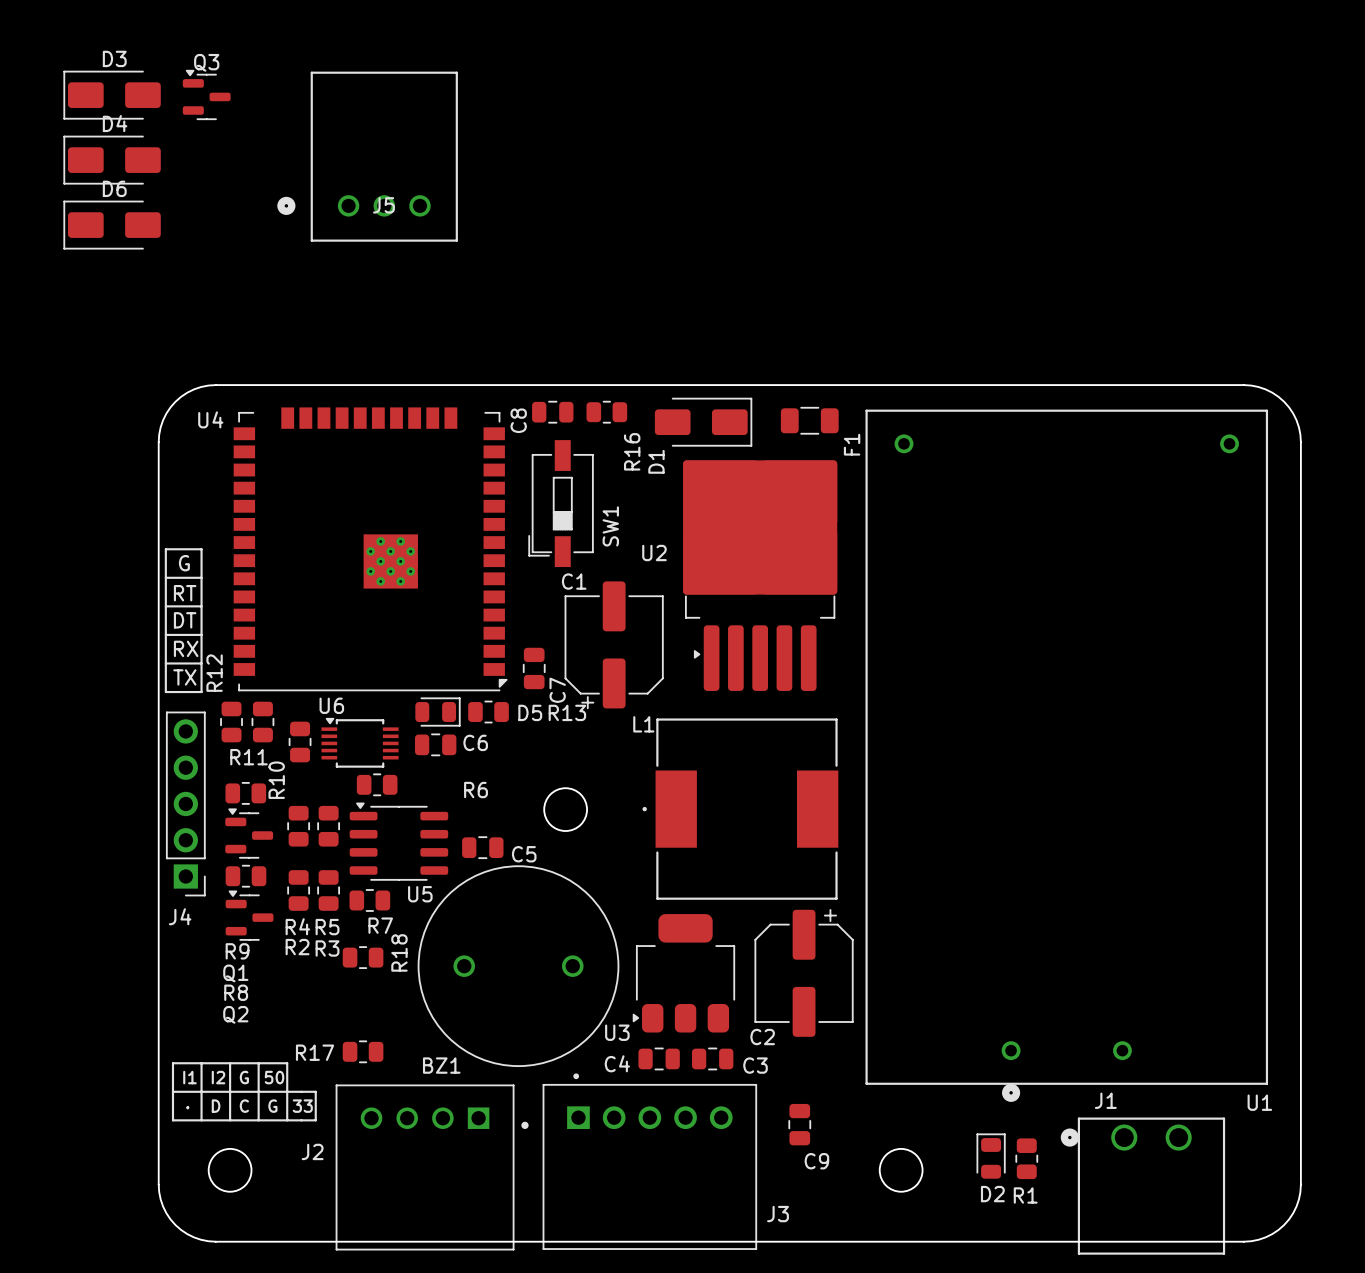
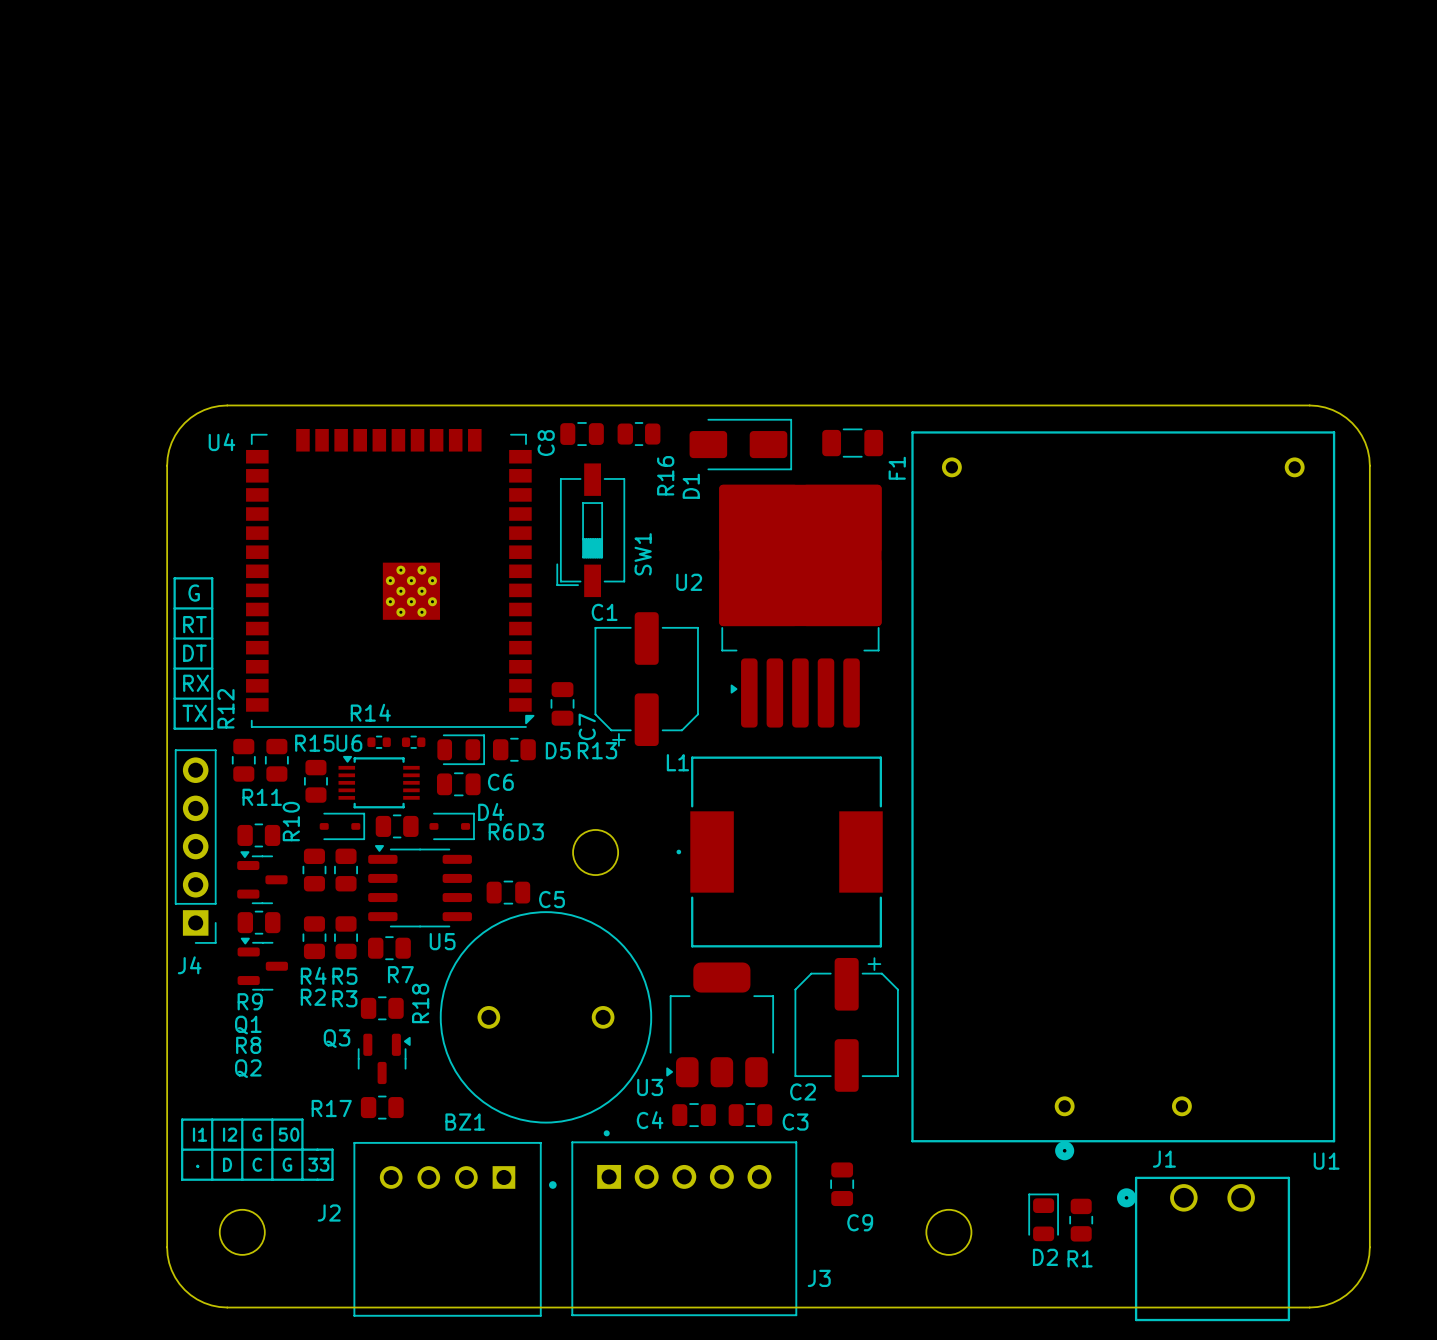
D3 name position: D3 (114, 58) -> D3 (531, 831)
Q3 name position: Q3 (206, 62) -> Q3 (337, 1038)
D3 footprint: [63, 70, 161, 120] -> [429, 812, 475, 841]
Q3 rotation: 0° (206, 94) -> 90° clockwise (384, 1058)
Q3 position: (206, 94) -> (384, 1058)
D4 name position: D4 (115, 123) -> D4 (491, 811)
D4 footprint: [63, 135, 161, 185] -> [319, 812, 366, 841]
J5: (367, 156) -> none
D6: (112, 225) -> none
R15: none -> (379, 742)
R14: none -> (413, 742)

